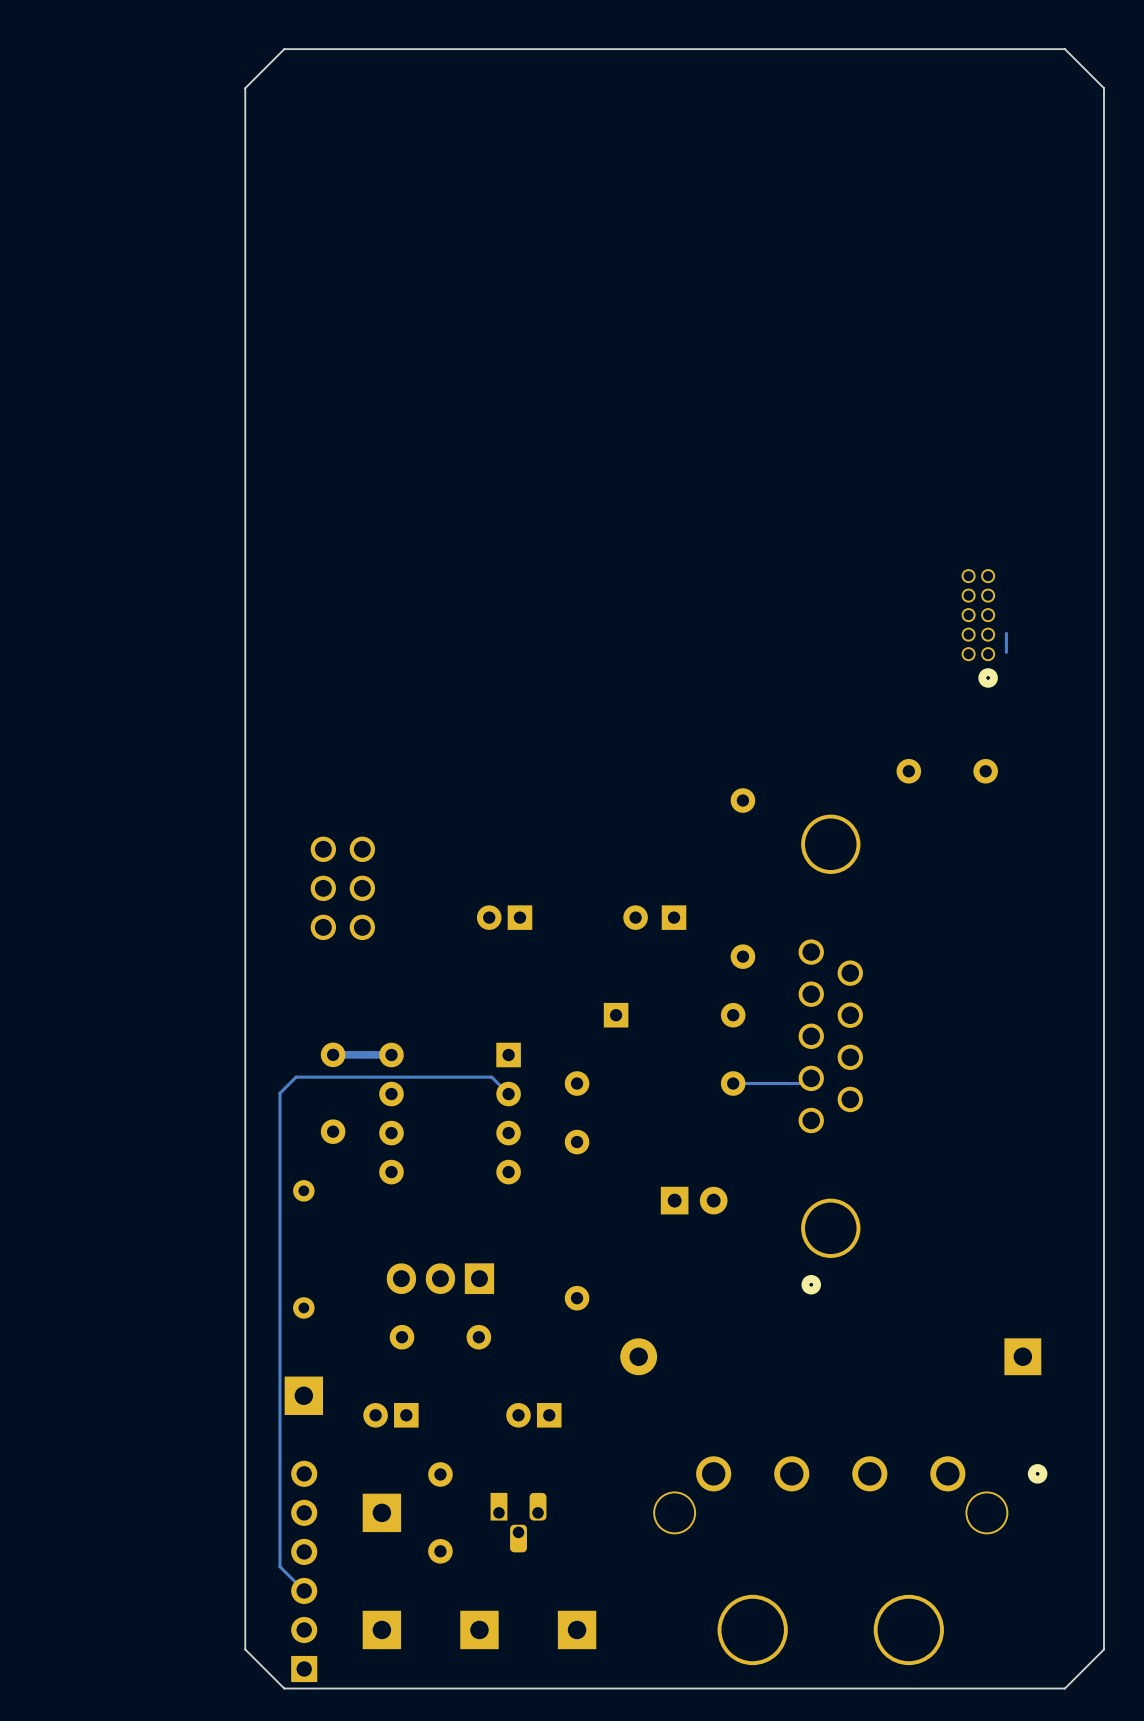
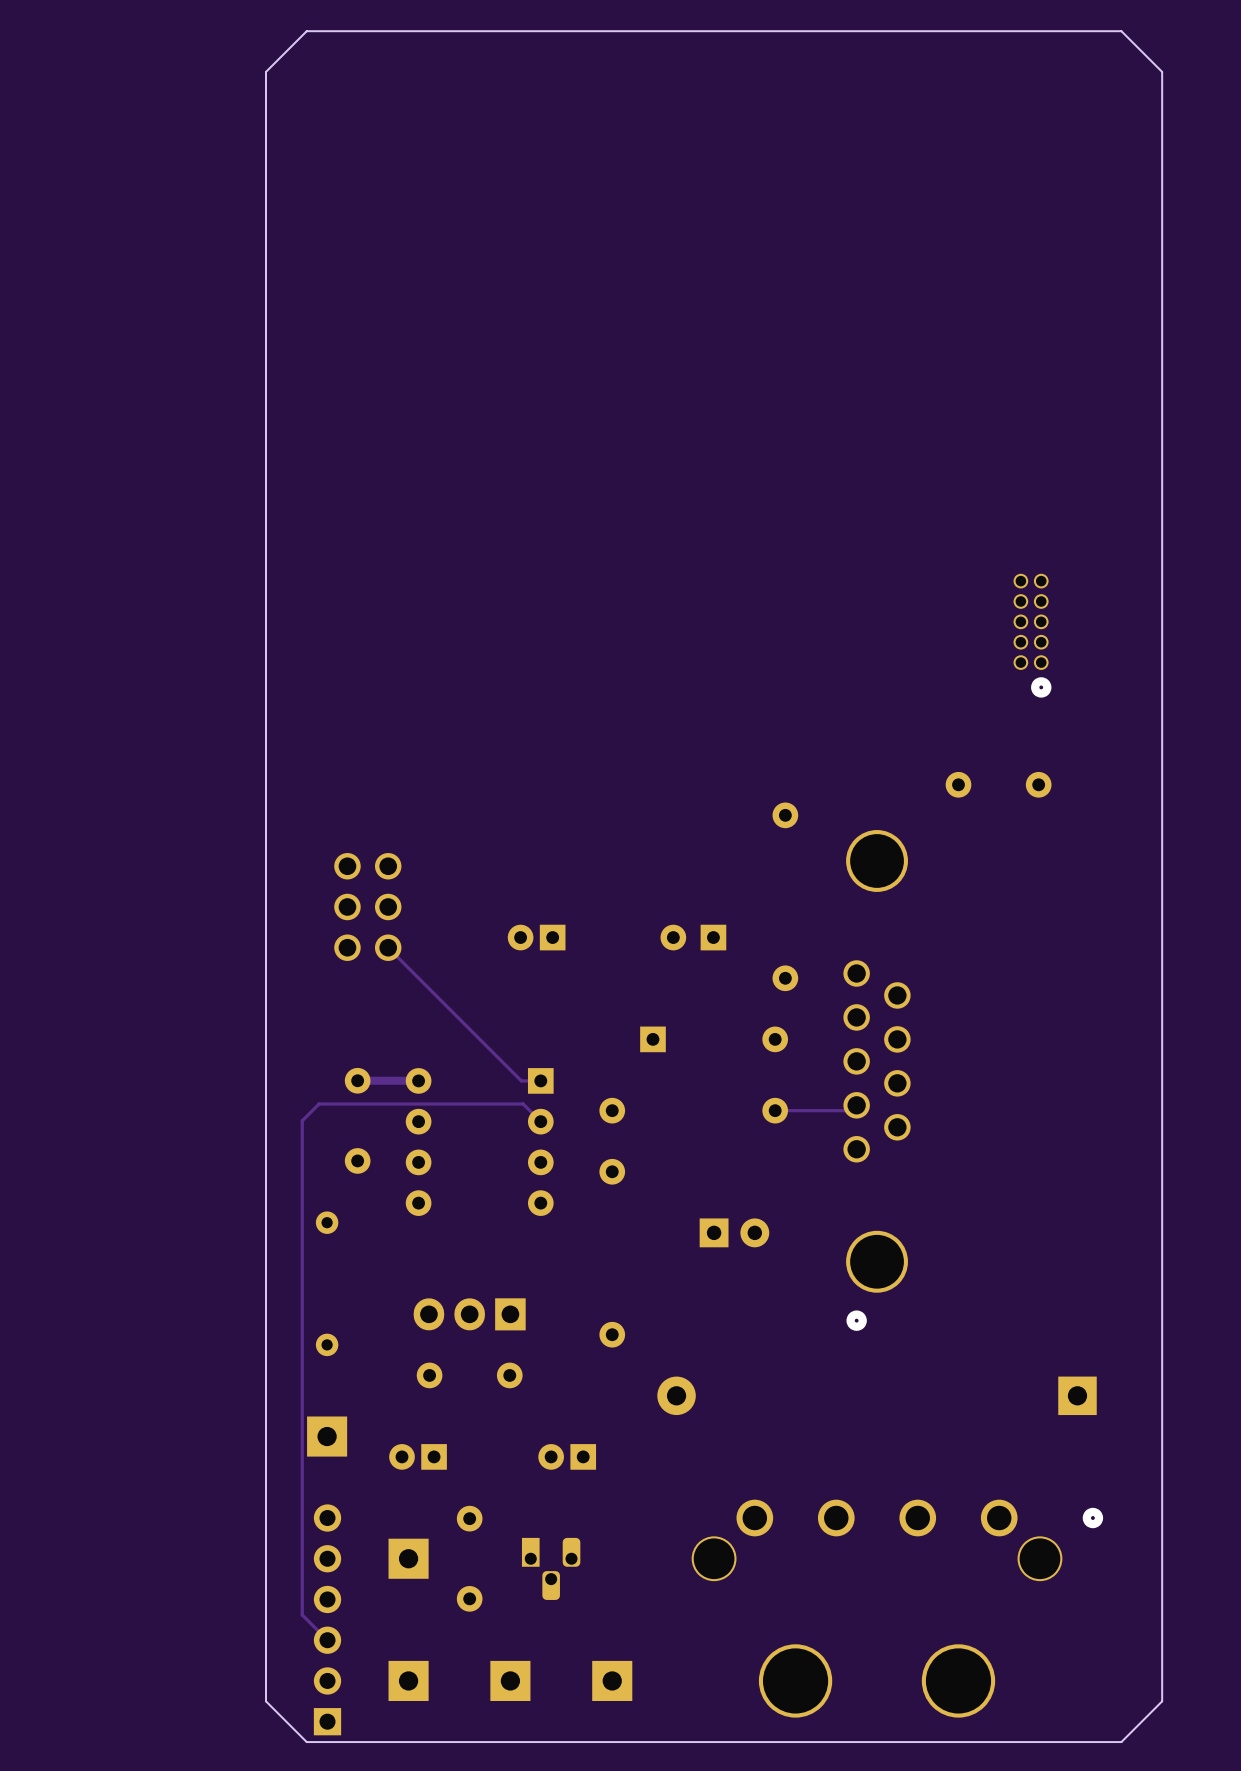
track: (1006, 633) (1006, 652) -> none
track: none -> (388, 947) (521, 1080) (540, 1080)

